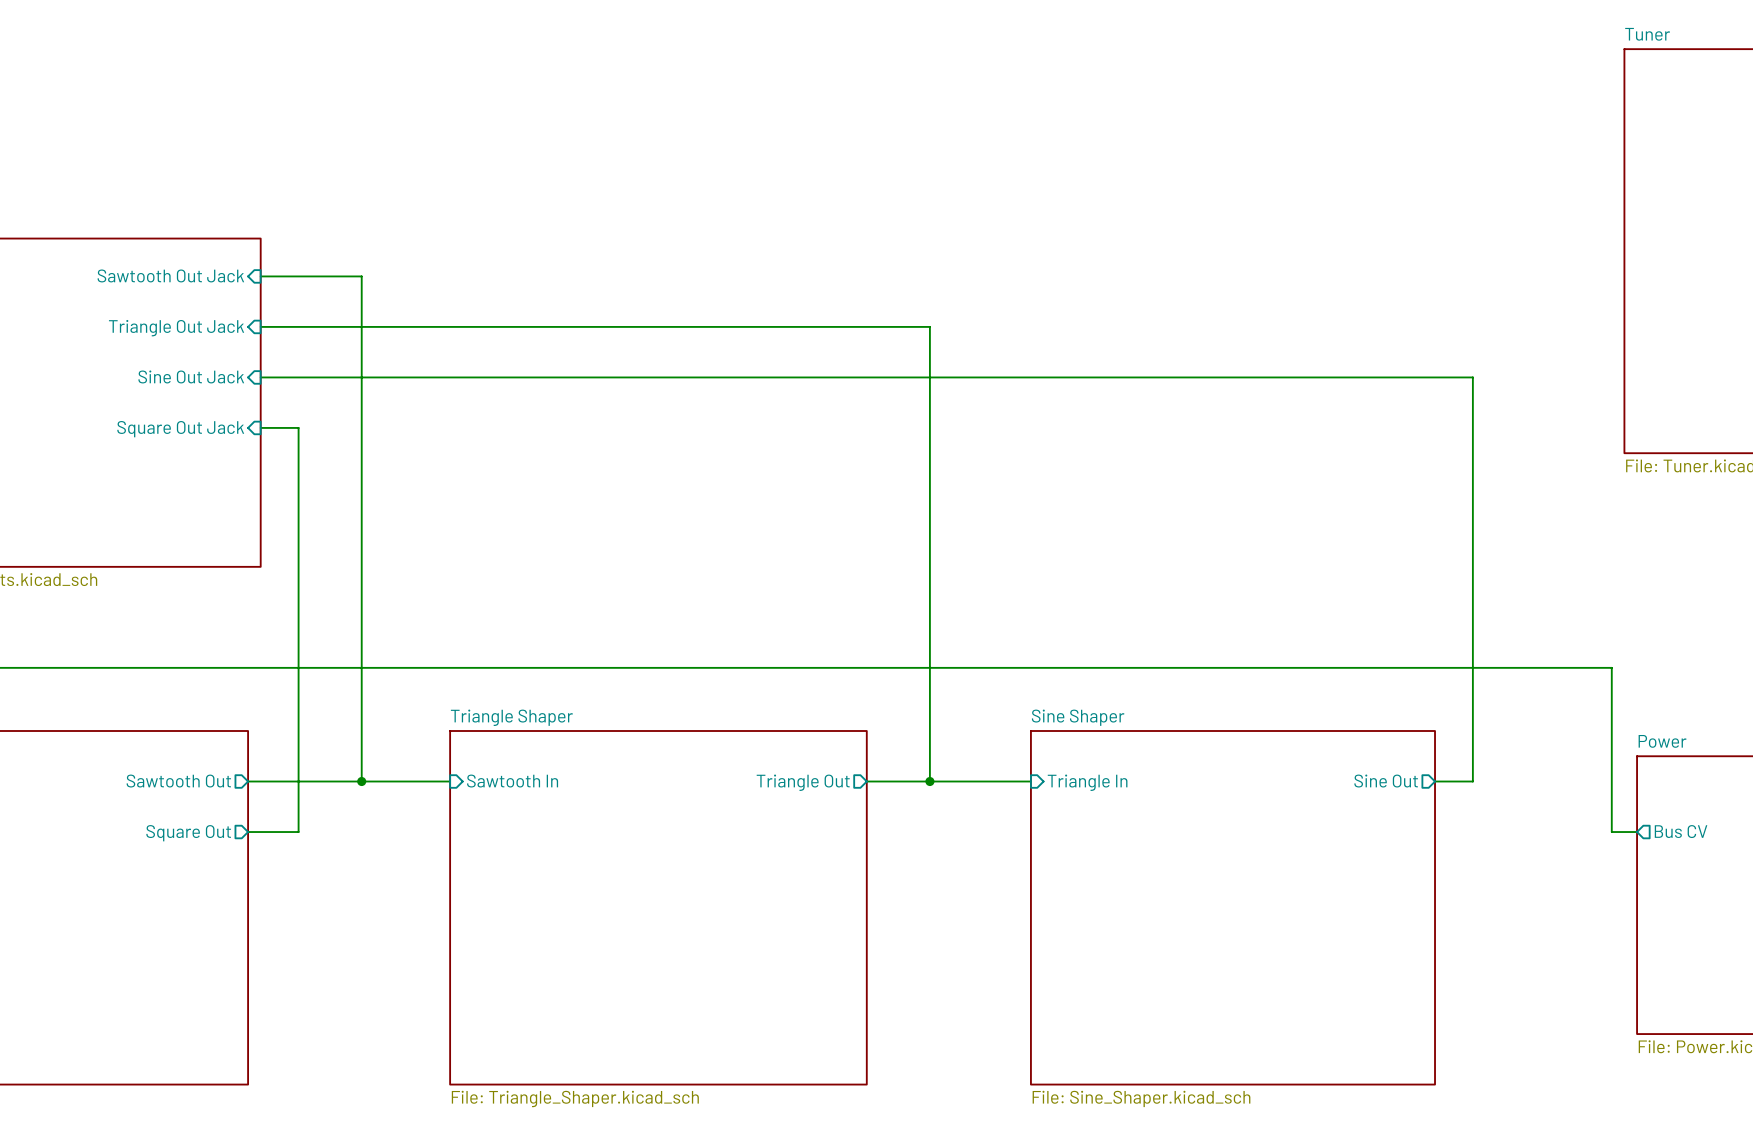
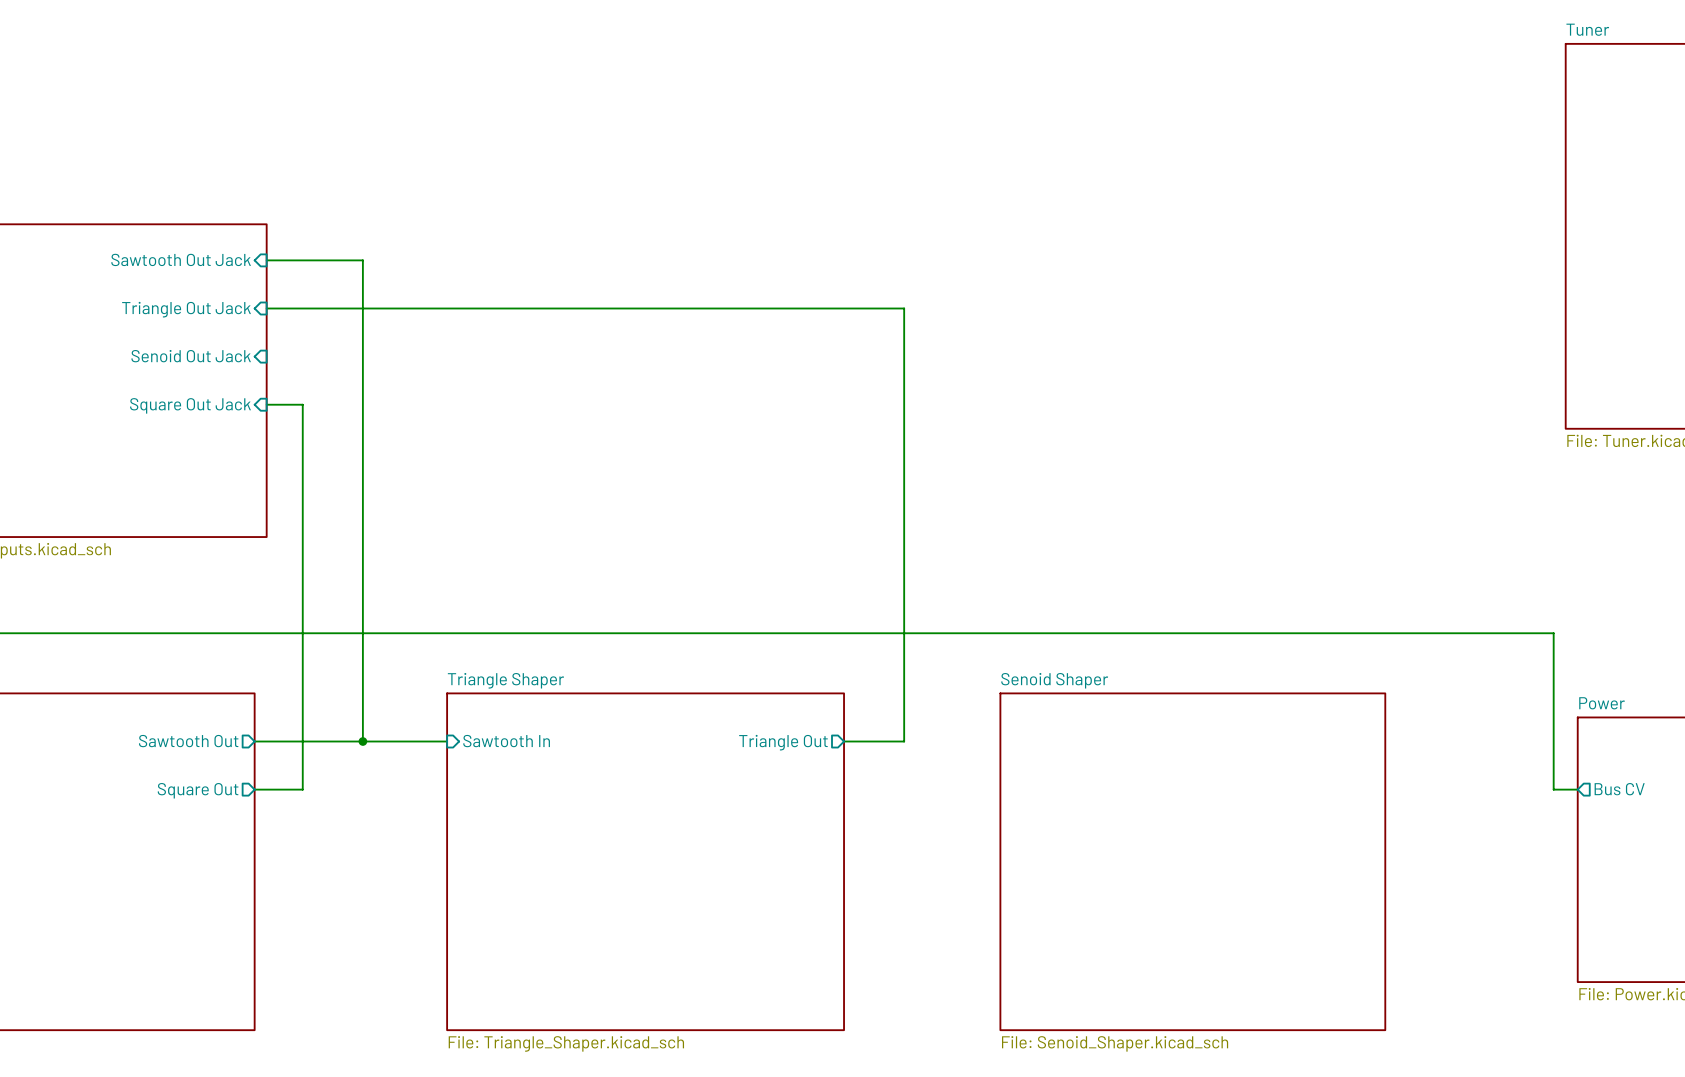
sheet pin: Sine Out Jack (191, 376) -> Senoid Out Jack (191, 356)
wire: (260, 377) (1472, 377) (1472, 781) (1435, 781) -> none
sheet Sine Shaper name: Sine Shaper (1078, 717) -> Senoid Shaper (1054, 680)
wire: (929, 781) (1030, 781) -> none
junction: (929, 781) -> none
sheet pin: Sine Out (1386, 781) -> none
sheet pin: Triangle In (1087, 782) -> none
sheet Sine Shaper value: File: Sine_Shaper.kicad_sch (1141, 1098) -> File: Senoid_Shaper.kicad_sch (1115, 1043)

